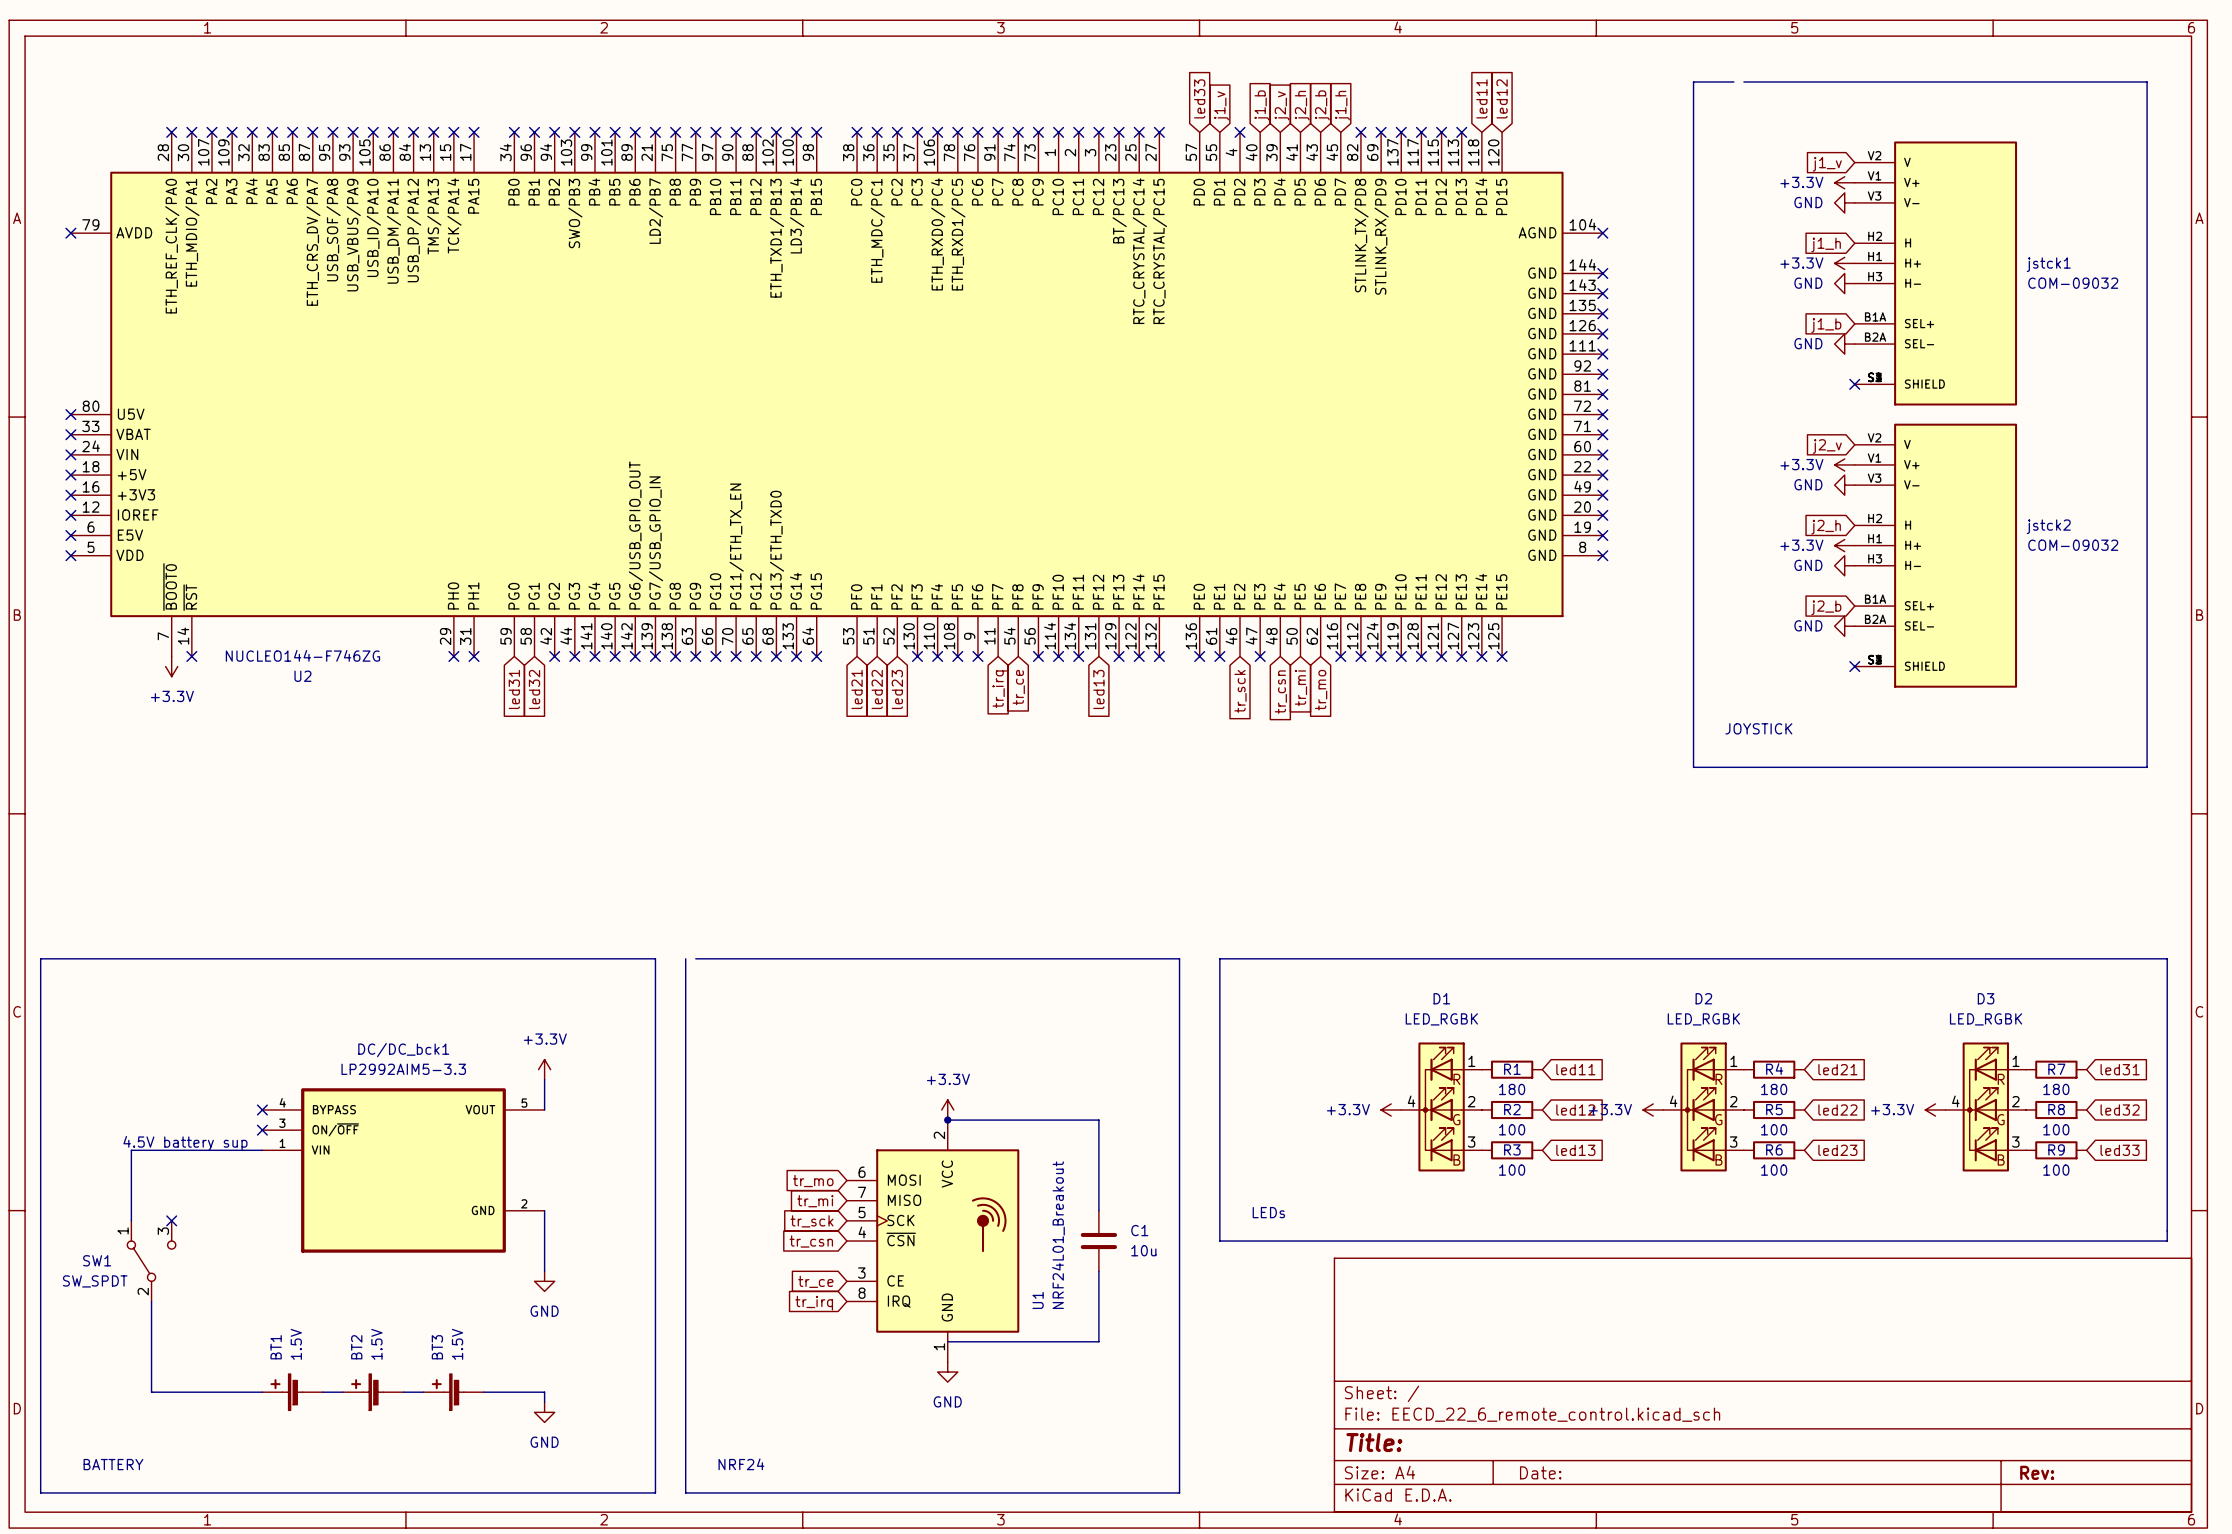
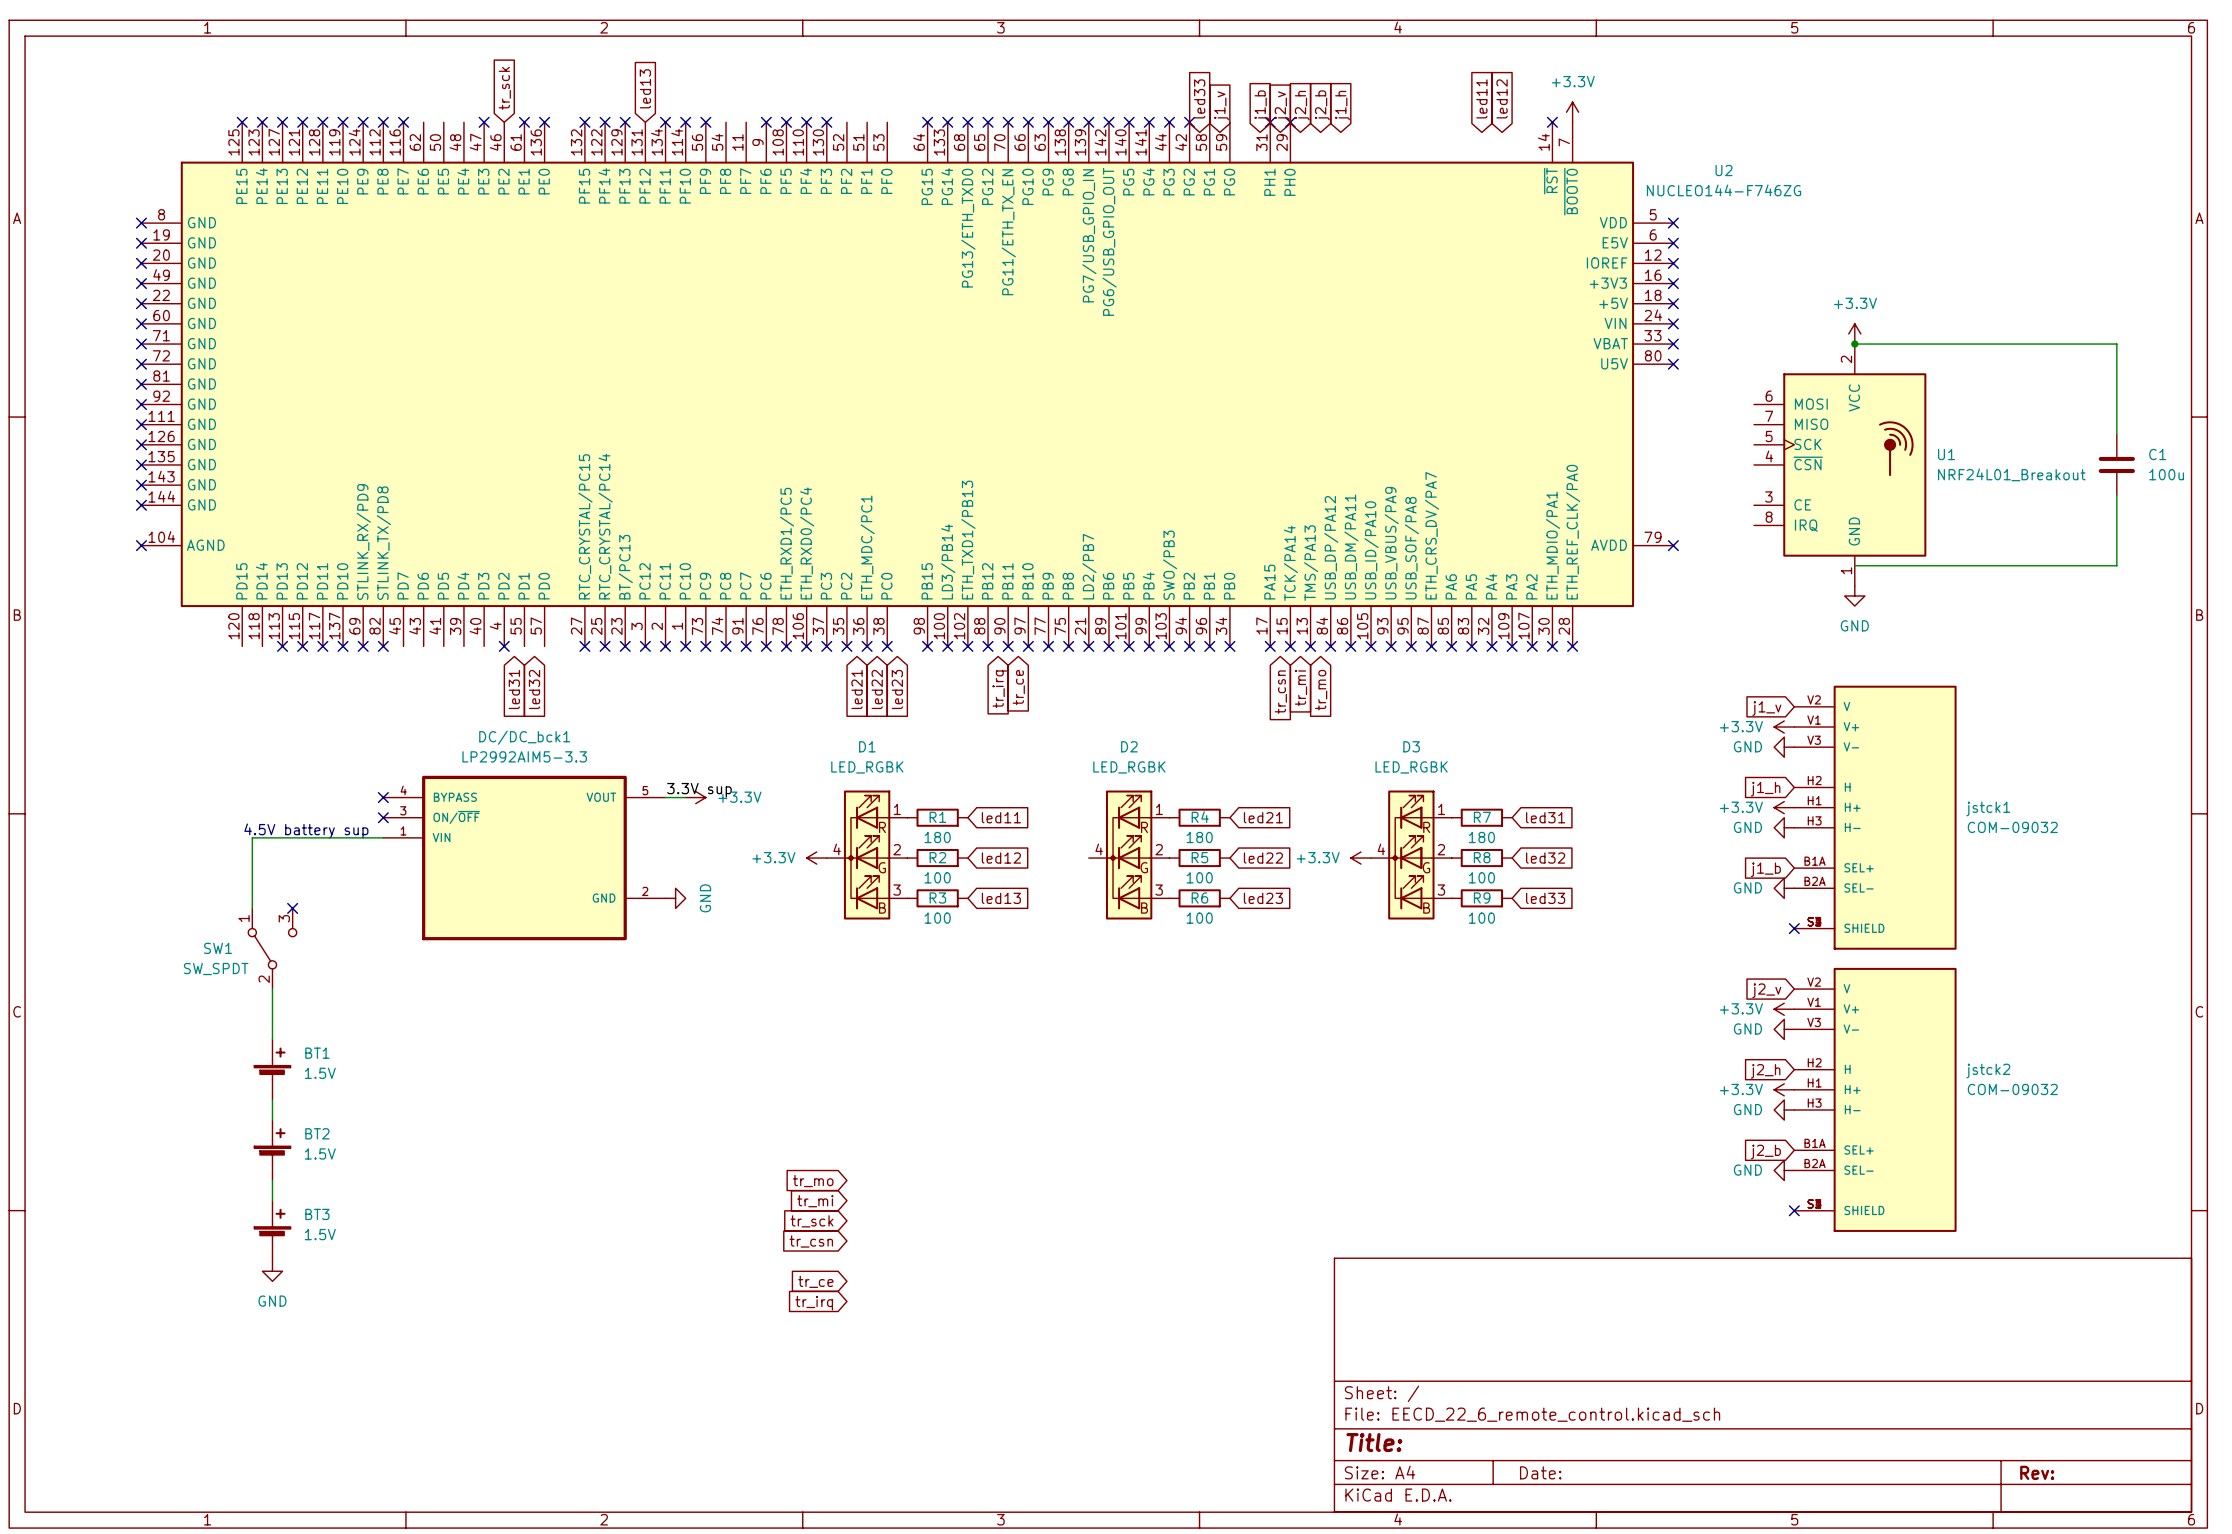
line: (1733, 81) (1693, 81) (1693, 767) (2147, 767) (2147, 81) (1743, 81) -> none
global label: none -> tr_sck (504, 88)
global label: none -> led13 (645, 88)
power symbol: none -> +3.3V (1572, 112)
no-connect mark: none -> (242, 122)
no-connect mark: none -> (262, 122)
no-connect mark: none -> (282, 122)
no-connect mark: none -> (302, 122)
no-connect mark: none -> (322, 122)
no-connect mark: none -> (343, 122)
no-connect mark: none -> (363, 122)
no-connect mark: none -> (383, 122)
no-connect mark: none -> (403, 122)
no-connect mark: none -> (524, 122)
no-connect mark: none -> (544, 122)
no-connect mark: none -> (584, 122)
no-connect mark: none -> (605, 122)
no-connect mark: none -> (625, 122)
no-connect mark: none -> (665, 122)
no-connect mark: none -> (685, 122)
no-connect mark: none -> (705, 122)
no-connect mark: none -> (766, 122)
no-connect mark: none -> (786, 122)
no-connect mark: none -> (806, 122)
no-connect mark: none -> (826, 122)
no-connect mark: none -> (927, 122)
no-connect mark: none -> (947, 122)
no-connect mark: none -> (967, 122)
no-connect mark: none -> (988, 122)
no-connect mark: none -> (1008, 122)
no-connect mark: none -> (1028, 122)
no-connect mark: none -> (1048, 122)
no-connect mark: none -> (1068, 122)
no-connect mark: none -> (1088, 122)
no-connect mark: none -> (1108, 122)
no-connect mark: none -> (1129, 122)
no-connect mark: none -> (1149, 122)
no-connect mark: none -> (1169, 122)
no-connect mark: none -> (1189, 122)
no-connect mark: none -> (1270, 122)
no-connect mark: none -> (1290, 122)
no-connect mark: none -> (1552, 122)
no-connect mark: (171, 132) -> none
no-connect mark: (191, 132) -> none
no-connect mark: (212, 132) -> none
no-connect mark: (232, 132) -> none
no-connect mark: (252, 132) -> none
no-connect mark: (272, 132) -> none
no-connect mark: (292, 132) -> none
no-connect mark: (312, 132) -> none
no-connect mark: (332, 132) -> none
no-connect mark: (353, 132) -> none
no-connect mark: (373, 132) -> none
no-connect mark: (393, 132) -> none
no-connect mark: (413, 132) -> none
no-connect mark: (433, 132) -> none
no-connect mark: (453, 132) -> none
no-connect mark position: (474, 132) -> (484, 122)
no-connect mark: (514, 132) -> none
no-connect mark: (534, 132) -> none
no-connect mark: (554, 132) -> none
no-connect mark: (574, 132) -> none
no-connect mark: (594, 132) -> none
no-connect mark: (615, 132) -> none
no-connect mark: (635, 132) -> none
no-connect mark: (655, 132) -> none
no-connect mark: (675, 132) -> none
no-connect mark: (695, 132) -> none
no-connect mark: (715, 132) -> none
no-connect mark: (736, 132) -> none
no-connect mark: (756, 132) -> none
no-connect mark: (776, 132) -> none
no-connect mark: (796, 132) -> none
no-connect mark: (816, 132) -> none
no-connect mark: (857, 132) -> none
no-connect mark: (877, 132) -> none
no-connect mark: (897, 132) -> none
no-connect mark: (917, 132) -> none
no-connect mark: (937, 132) -> none
no-connect mark: (957, 132) -> none
no-connect mark: (977, 132) -> none
no-connect mark: (998, 132) -> none
no-connect mark: (1018, 132) -> none
no-connect mark: (1038, 132) -> none
no-connect mark: (1058, 132) -> none
no-connect mark: (1078, 132) -> none
no-connect mark: (1098, 132) -> none
no-connect mark: (1119, 132) -> none
no-connect mark: (1139, 132) -> none
no-connect mark: (1159, 132) -> none
no-connect mark: (1240, 132) -> none
no-connect mark: (1360, 132) -> none
no-connect mark: (1381, 132) -> none
no-connect mark: (1401, 132) -> none
no-connect mark: (1421, 132) -> none
no-connect mark: (1441, 132) -> none
no-connect mark: (1461, 132) -> none
global label: j1_v (1827, 164) -> none
power symbol: +3.3V (1844, 182) -> none
power symbol: GND (1844, 202) -> none
no-connect mark: none -> (141, 223)
no-connect mark: none -> (1673, 223)
no-connect mark: (70, 233) -> none
no-connect mark: (1602, 233) -> none
no-connect mark: none -> (141, 243)
no-connect mark: none -> (1673, 243)
global label: j1_h (1826, 244) -> none
no-connect mark: none -> (141, 263)
no-connect mark: none -> (1673, 263)
power symbol: +3.3V (1844, 263) -> none
no-connect mark: (1602, 273) -> none
jstck1 position: (1935, 273) -> (1875, 817)
no-connect mark: none -> (141, 283)
no-connect mark: none -> (1673, 283)
power symbol: GND (1844, 283) -> none
no-connect mark: (1602, 293) -> none
no-connect mark: none -> (141, 303)
no-connect mark: none -> (1673, 303)
no-connect mark: (1602, 313) -> none
no-connect mark: none -> (141, 323)
no-connect mark: none -> (1673, 323)
global label: j1_b (1826, 325) -> none
no-connect mark: (1602, 333) -> none
power symbol: none -> +3.3V (1854, 333)
no-connect mark: none -> (141, 344)
no-connect mark: none -> (1673, 344)
power symbol: GND (1844, 344) -> none
wire: none -> (1854, 344) (2116, 344) (2116, 434)
junction: none -> (1854, 344)
no-connect mark: (1602, 354) -> none
no-connect mark: none -> (141, 364)
no-connect mark: none -> (1673, 364)
no-connect mark: (1602, 374) -> none
no-connect mark: none -> (141, 384)
no-connect mark: (1854, 384) -> none
U2 rotation: 0° (836, 394) -> 180° (907, 384)
no-connect mark: (1602, 394) -> none
no-connect mark: none -> (141, 404)
no-connect mark: (70, 414) -> none
no-connect mark: (1602, 414) -> none
no-connect mark: none -> (141, 424)
no-connect mark: (70, 434) -> none
no-connect mark: (1602, 434) -> none
no-connect mark: none -> (141, 444)
global label: j2_v (1827, 446) -> none
no-connect mark: (70, 454) -> none
no-connect mark: (1602, 454) -> none
no-connect mark: none -> (141, 464)
power symbol: +3.3V (1844, 464) -> none
no-connect mark: (70, 475) -> none
no-connect mark: (1602, 475) -> none
no-connect mark: none -> (141, 485)
power symbol: GND (1844, 485) -> none
no-connect mark: (70, 495) -> none
no-connect mark: (1602, 495) -> none
wire: none -> (2116, 495) (2116, 565) (1854, 565)
no-connect mark: none -> (141, 505)
no-connect mark: (70, 515) -> none
no-connect mark: (1602, 515) -> none
global label: j2_h (1826, 527) -> none
no-connect mark: (70, 535) -> none
no-connect mark: (1602, 535) -> none
no-connect mark: none -> (141, 545)
no-connect mark: none -> (1673, 545)
power symbol: +3.3V (1844, 545) -> none
no-connect mark: (70, 555) -> none
no-connect mark: (1602, 555) -> none
jstck2 position: (1935, 555) -> (1875, 1099)
power symbol: GND (1844, 565) -> none
power symbol: none -> GND (1854, 595)
global label: j2_b (1826, 607) -> none
power symbol: GND (1844, 626) -> none
no-connect mark: none -> (282, 646)
no-connect mark: none -> (302, 646)
no-connect mark: none -> (322, 646)
no-connect mark: none -> (343, 646)
no-connect mark: none -> (363, 646)
no-connect mark: none -> (383, 646)
no-connect mark: none -> (504, 646)
no-connect mark: none -> (584, 646)
no-connect mark: none -> (605, 646)
no-connect mark: none -> (625, 646)
no-connect mark: none -> (645, 646)
no-connect mark: none -> (665, 646)
no-connect mark: none -> (685, 646)
no-connect mark: none -> (705, 646)
no-connect mark: none -> (726, 646)
no-connect mark: none -> (746, 646)
no-connect mark: none -> (766, 646)
no-connect mark: none -> (786, 646)
no-connect mark: none -> (806, 646)
no-connect mark: none -> (826, 646)
no-connect mark: none -> (846, 646)
no-connect mark: none -> (867, 646)
no-connect mark: none -> (887, 646)
no-connect mark: none -> (927, 646)
no-connect mark: none -> (947, 646)
no-connect mark: none -> (967, 646)
no-connect mark: none -> (988, 646)
no-connect mark: none -> (1008, 646)
no-connect mark: none -> (1028, 646)
no-connect mark: none -> (1048, 646)
no-connect mark: none -> (1068, 646)
no-connect mark: none -> (1088, 646)
no-connect mark: none -> (1108, 646)
no-connect mark: none -> (1129, 646)
no-connect mark: none -> (1149, 646)
no-connect mark: none -> (1169, 646)
no-connect mark: none -> (1189, 646)
no-connect mark: none -> (1209, 646)
no-connect mark: none -> (1229, 646)
no-connect mark: none -> (1290, 646)
no-connect mark: none -> (1310, 646)
no-connect mark: none -> (1330, 646)
no-connect mark: none -> (1350, 646)
no-connect mark: none -> (1371, 646)
no-connect mark: none -> (1391, 646)
no-connect mark: none -> (1411, 646)
no-connect mark: none -> (1431, 646)
no-connect mark: none -> (1451, 646)
no-connect mark: none -> (1471, 646)
no-connect mark: none -> (1491, 646)
no-connect mark: none -> (1512, 646)
no-connect mark: none -> (1532, 646)
no-connect mark: none -> (1552, 646)
no-connect mark: none -> (1572, 646)
U2 value position: NUCLEO144-F746ZG (302, 655) -> NUCLEO144-F746ZG (1724, 190)
no-connect mark: (191, 656) -> none
no-connect mark: (453, 656) -> none
no-connect mark: (474, 656) -> none
no-connect mark: (554, 656) -> none
no-connect mark: (574, 656) -> none
no-connect mark: (594, 656) -> none
no-connect mark: (615, 656) -> none
no-connect mark: (635, 656) -> none
no-connect mark: (655, 656) -> none
no-connect mark: (675, 656) -> none
no-connect mark: (695, 656) -> none
no-connect mark: (715, 656) -> none
no-connect mark: (736, 656) -> none
no-connect mark: (756, 656) -> none
no-connect mark: (776, 656) -> none
no-connect mark: (796, 656) -> none
no-connect mark: (816, 656) -> none
no-connect mark: (917, 656) -> none
no-connect mark: (937, 656) -> none
no-connect mark: (957, 656) -> none
no-connect mark: (977, 656) -> none
no-connect mark: (1038, 656) -> none
no-connect mark: (1058, 656) -> none
no-connect mark: (1078, 656) -> none
no-connect mark: (1119, 656) -> none
no-connect mark: (1139, 656) -> none
no-connect mark: (1159, 656) -> none
no-connect mark: (1199, 656) -> none
no-connect mark: (1219, 656) -> none
no-connect mark position: (1260, 656) -> (1270, 646)
no-connect mark: (1340, 656) -> none
no-connect mark: (1360, 656) -> none
no-connect mark: (1381, 656) -> none
no-connect mark: (1401, 656) -> none
no-connect mark: (1421, 656) -> none
no-connect mark: (1441, 656) -> none
no-connect mark: (1461, 656) -> none
no-connect mark: (1481, 656) -> none
no-connect mark: (1502, 656) -> none
power symbol: +3.3V (171, 666) -> none
no-connect mark: (1854, 666) -> none
U2 name position: U2 (302, 676) -> U2 (1724, 170)
global label: led13 (1098, 689) -> none
global label: tr_sck (1240, 691) -> none
global label: none -> j1_v (1766, 708)
power symbol: none -> +3.3V (1784, 727)
text: JOYSTICK (1758, 728) -> none
power symbol: none -> GND (1784, 747)
global label: none -> j1_h (1765, 789)
label: none -> 3.3V sup (699, 790)
no-connect mark: none -> (383, 797)
wire: none -> (665, 797) (685, 797)
power symbol: none -> +3.3V (695, 797)
power symbol: none -> +3.3V (1784, 807)
no-connect mark: none -> (383, 817)
global label: none -> led11 (1001, 817)
global label: none -> led21 (1263, 817)
global label: none -> led31 (1545, 817)
power symbol: none -> GND (1784, 827)
text: none -> 4.5V battery sup (306, 831)
wire: none -> (383, 837) (252, 837) (252, 908)
power symbol: none -> +3.3V (816, 858)
global label: none -> led12 (1001, 858)
global label: none -> led22 (1263, 858)
power symbol: none -> +3.3V (1360, 858)
global label: none -> led32 (1545, 858)
global label: none -> j1_b (1765, 869)
power symbol: none -> GND (1784, 888)
power symbol: none -> GND (675, 898)
global label: none -> led13 (1001, 898)
global label: none -> led23 (1263, 898)
global label: none -> led33 (1545, 898)
no-connect mark: none -> (292, 908)
no-connect mark: none -> (1794, 928)
line: (40, 958) (655, 958) (655, 1492) (40, 1492) (40, 958) -> none
line: (685, 958) (685, 1492) (1179, 1492) (1179, 958) (695, 958) -> none
line: (1219, 958) (2167, 958) (2167, 1241) (1219, 1241) (1219, 958) -> none
wire: none -> (272, 989) (272, 1039)
global label: none -> j2_v (1766, 990)
power symbol: none -> +3.3V (1784, 1009)
power symbol: none -> GND (1784, 1029)
power symbol: +3.3V (544, 1069) -> none
R1 position: (1512, 1069) -> (937, 817)
global label: led11 (1575, 1069) -> none
R4 position: (1774, 1069) -> (1199, 817)
global label: led21 (1837, 1069) -> none
R7 position: (2056, 1069) -> (1481, 817)
global label: led31 (2120, 1069) -> none
global label: none -> j2_h (1765, 1071)
wire: (544, 1079) (544, 1109) -> none
power symbol: none -> +3.3V (1784, 1089)
wire: none -> (272, 1099) (272, 1120)
D1 position: (1441, 1106) -> (867, 855)
D2 position: (1703, 1106) -> (1129, 855)
D3 position: (1985, 1106) -> (1411, 855)
no-connect mark: (262, 1109) -> none
power symbol: +3.3V (947, 1109) -> none
power symbol: +3.3V (1391, 1109) -> none
R2 position: (1512, 1109) -> (937, 858)
global label: led12 (1575, 1109) -> none
power symbol: +3.3V (1653, 1109) -> none
R5 position: (1774, 1109) -> (1199, 858)
power symbol: none -> GND (1784, 1109)
global label: led22 (1837, 1109) -> none
power symbol: +3.3V (1935, 1109) -> none
R8 position: (2056, 1109) -> (1481, 858)
global label: led32 (2120, 1109) -> none
wire: (947, 1120) (1098, 1120) (1098, 1210) -> none
junction: (947, 1120) -> none
no-connect mark: (262, 1130) -> none
text: 4.5V battery sup (185, 1143) -> none
wire: (262, 1150) (131, 1150) (131, 1220) -> none
R3 position: (1512, 1150) -> (937, 898)
global label: led13 (1575, 1150) -> none
R6 position: (1774, 1150) -> (1199, 898)
global label: led23 (1837, 1150) -> none
R9 position: (2056, 1150) -> (1481, 898)
global label: led33 (2120, 1150) -> none
global label: none -> j2_b (1765, 1151)
DC/DC_bck1 position: (403, 1170) -> (524, 858)
power symbol: none -> GND (1784, 1170)
wire: none -> (272, 1180) (272, 1200)
wire: (544, 1210) (544, 1271) -> none
no-connect mark: none -> (1794, 1210)
text: LEDs (1268, 1212) -> none
no-connect mark: (171, 1220) -> none
U1 value rotation: 0° (1058, 1235) -> 90° clockwise (2011, 474)
U1 position: (933, 1241) -> (1840, 464)
C1 position: (1098, 1241) -> (2116, 464)
C1 value: 10u (1143, 1250) -> 100u (2166, 474)
SW1 position: (151, 1261) -> (272, 948)
power symbol: none -> GND (272, 1271)
wire: (1098, 1271) (1098, 1341) (947, 1341) -> none
power symbol: GND (544, 1281) -> none
U1 name rotation: 0° (1038, 1300) -> 90° clockwise (1946, 454)
U1 name position: U1 (1038, 1300) -> U1 (1946, 454)
wire: (151, 1301) (151, 1392) (262, 1392) -> none
power symbol: GND (947, 1372) -> none
BT1 rotation: 0° (286, 1392) -> 90° clockwise (272, 1063)
BT1 position: (292, 1392) -> (272, 1069)
wire: (322, 1392) (343, 1392) -> none
BT2 rotation: 0° (367, 1392) -> 90° clockwise (272, 1144)
BT2 position: (373, 1392) -> (272, 1150)
wire: (403, 1392) (423, 1392) -> none
BT3 rotation: 0° (447, 1392) -> 90° clockwise (272, 1224)
BT3 position: (453, 1392) -> (272, 1230)
wire: (484, 1392) (544, 1392) (544, 1402) -> none
power symbol: GND (544, 1412) -> none
text: BATTERY (113, 1464) -> none
text: NRF24 (741, 1464) -> none

